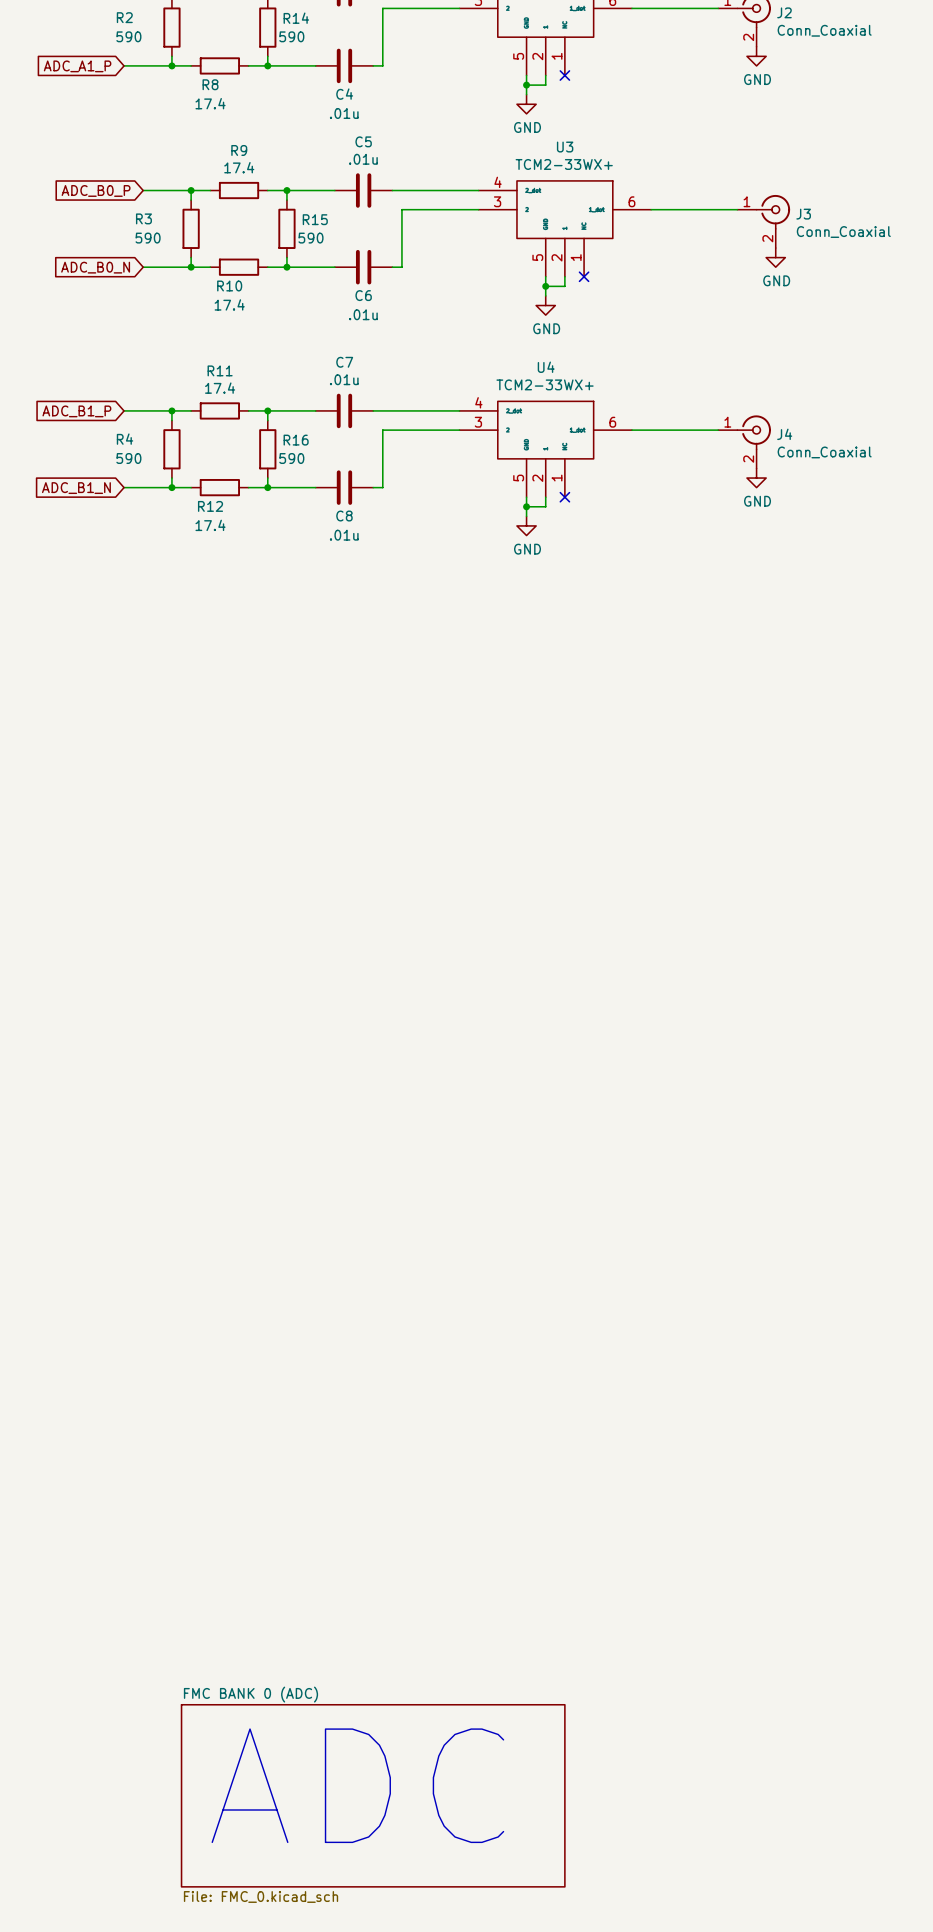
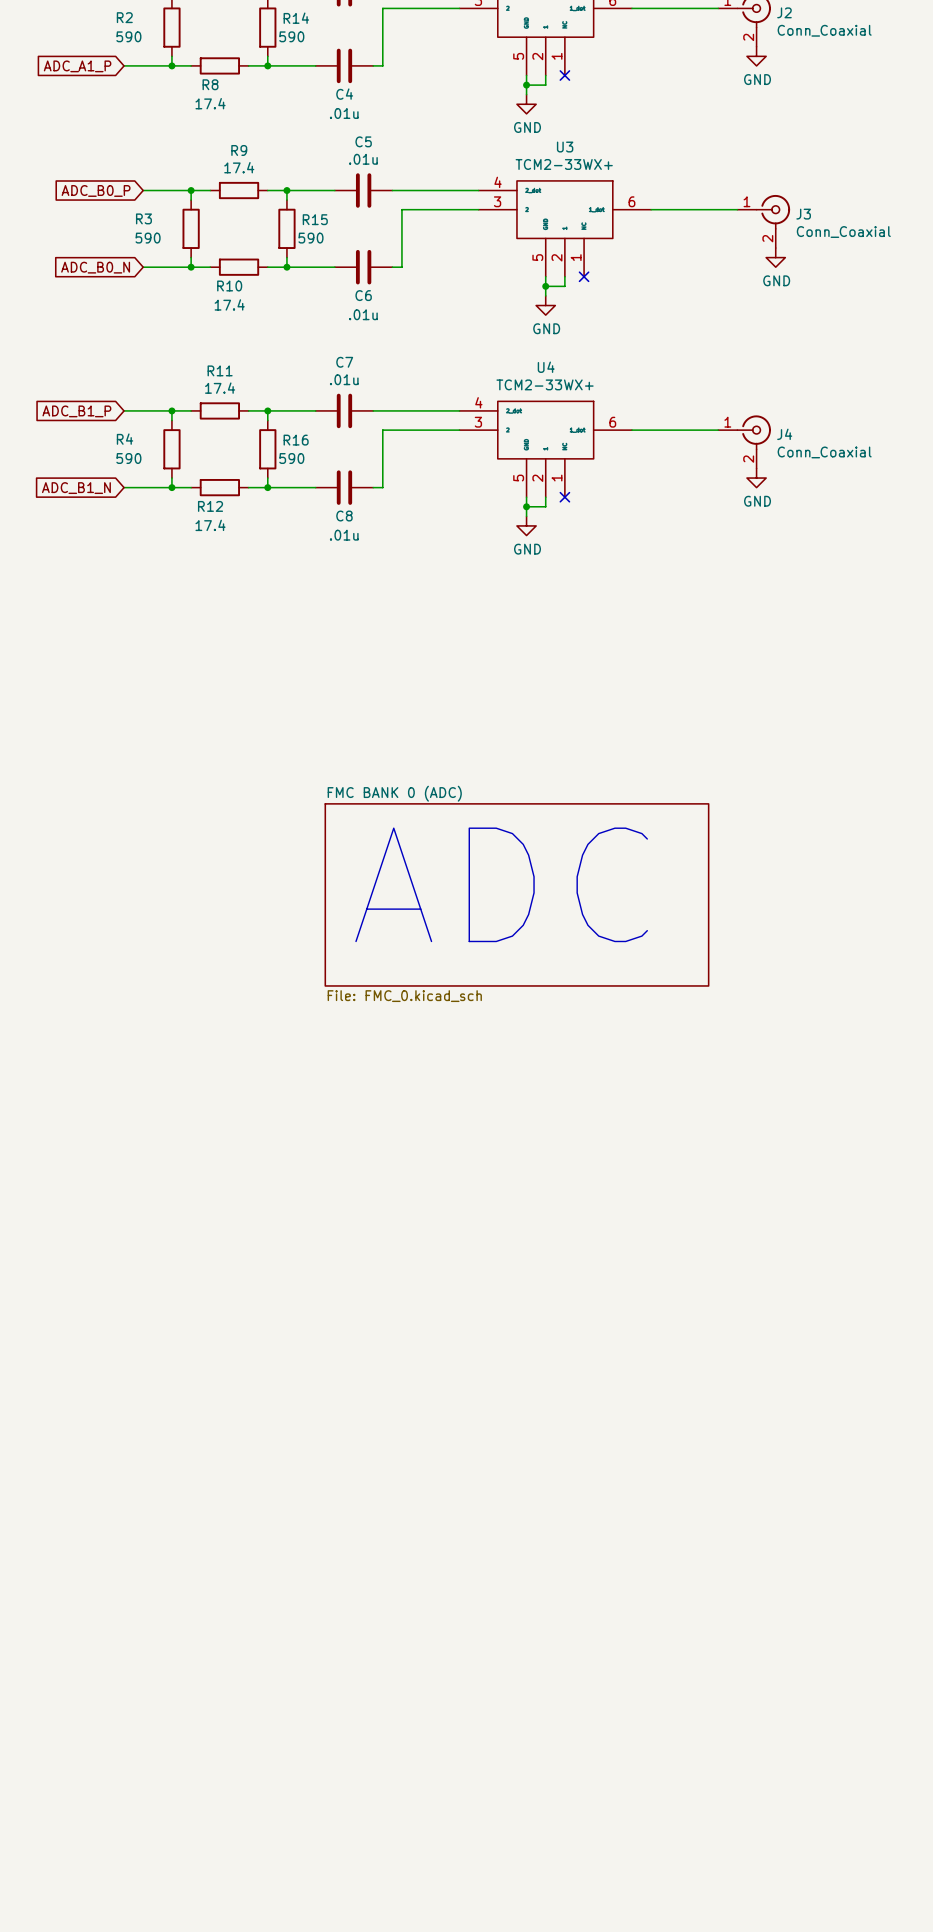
text: none -> ADC (501, 884)
text: ADC (357, 1785) -> none
sheet FMC BANK 0 (ADC) position: (373, 1795) -> (516, 894)

